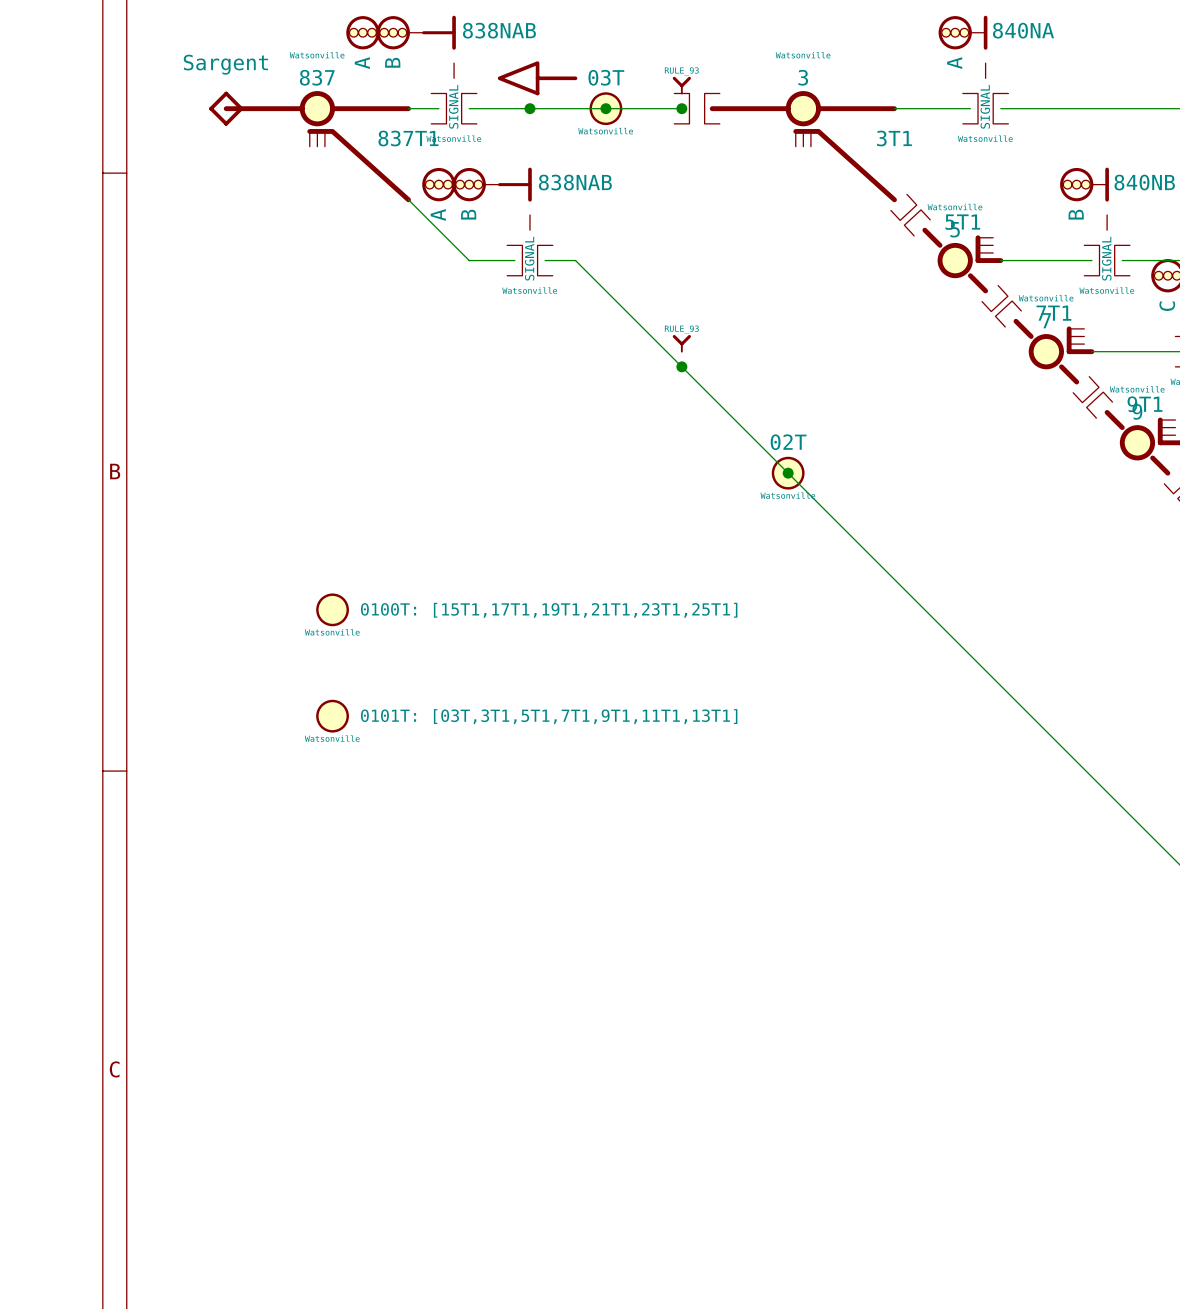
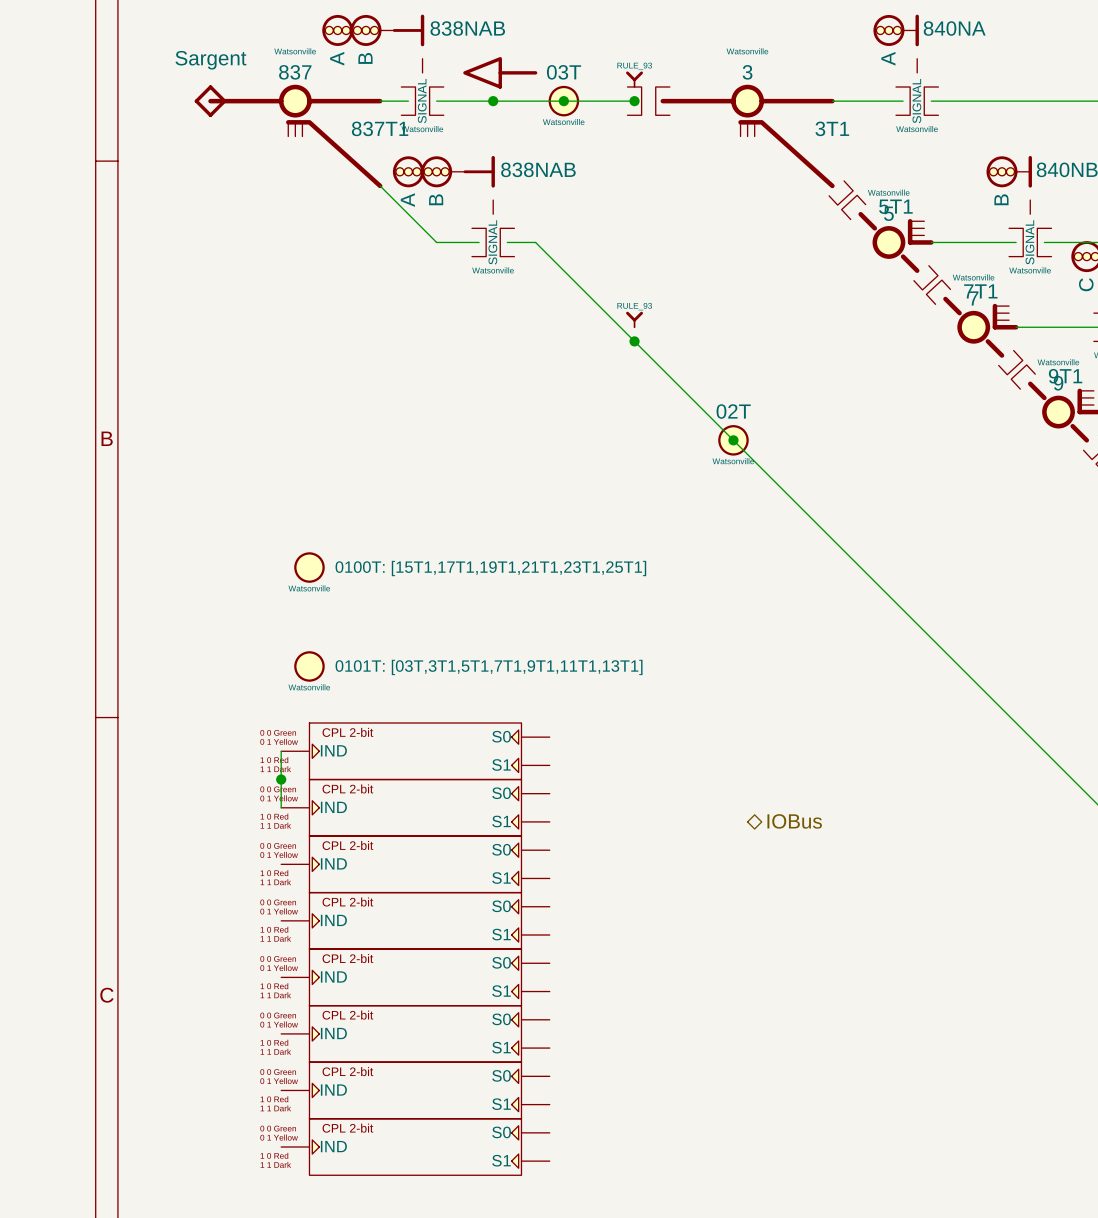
wire: none -> (281, 751) (281, 807)
part: none -> (415, 751)
junction: none -> (281, 779)
part: none -> (415, 807)
hierarchical label: none -> IOBus (794, 821)
part: none -> (415, 864)
part: none -> (415, 920)
part: none -> (415, 977)
part: none -> (415, 1033)
part: none -> (415, 1090)
part: none -> (415, 1146)

